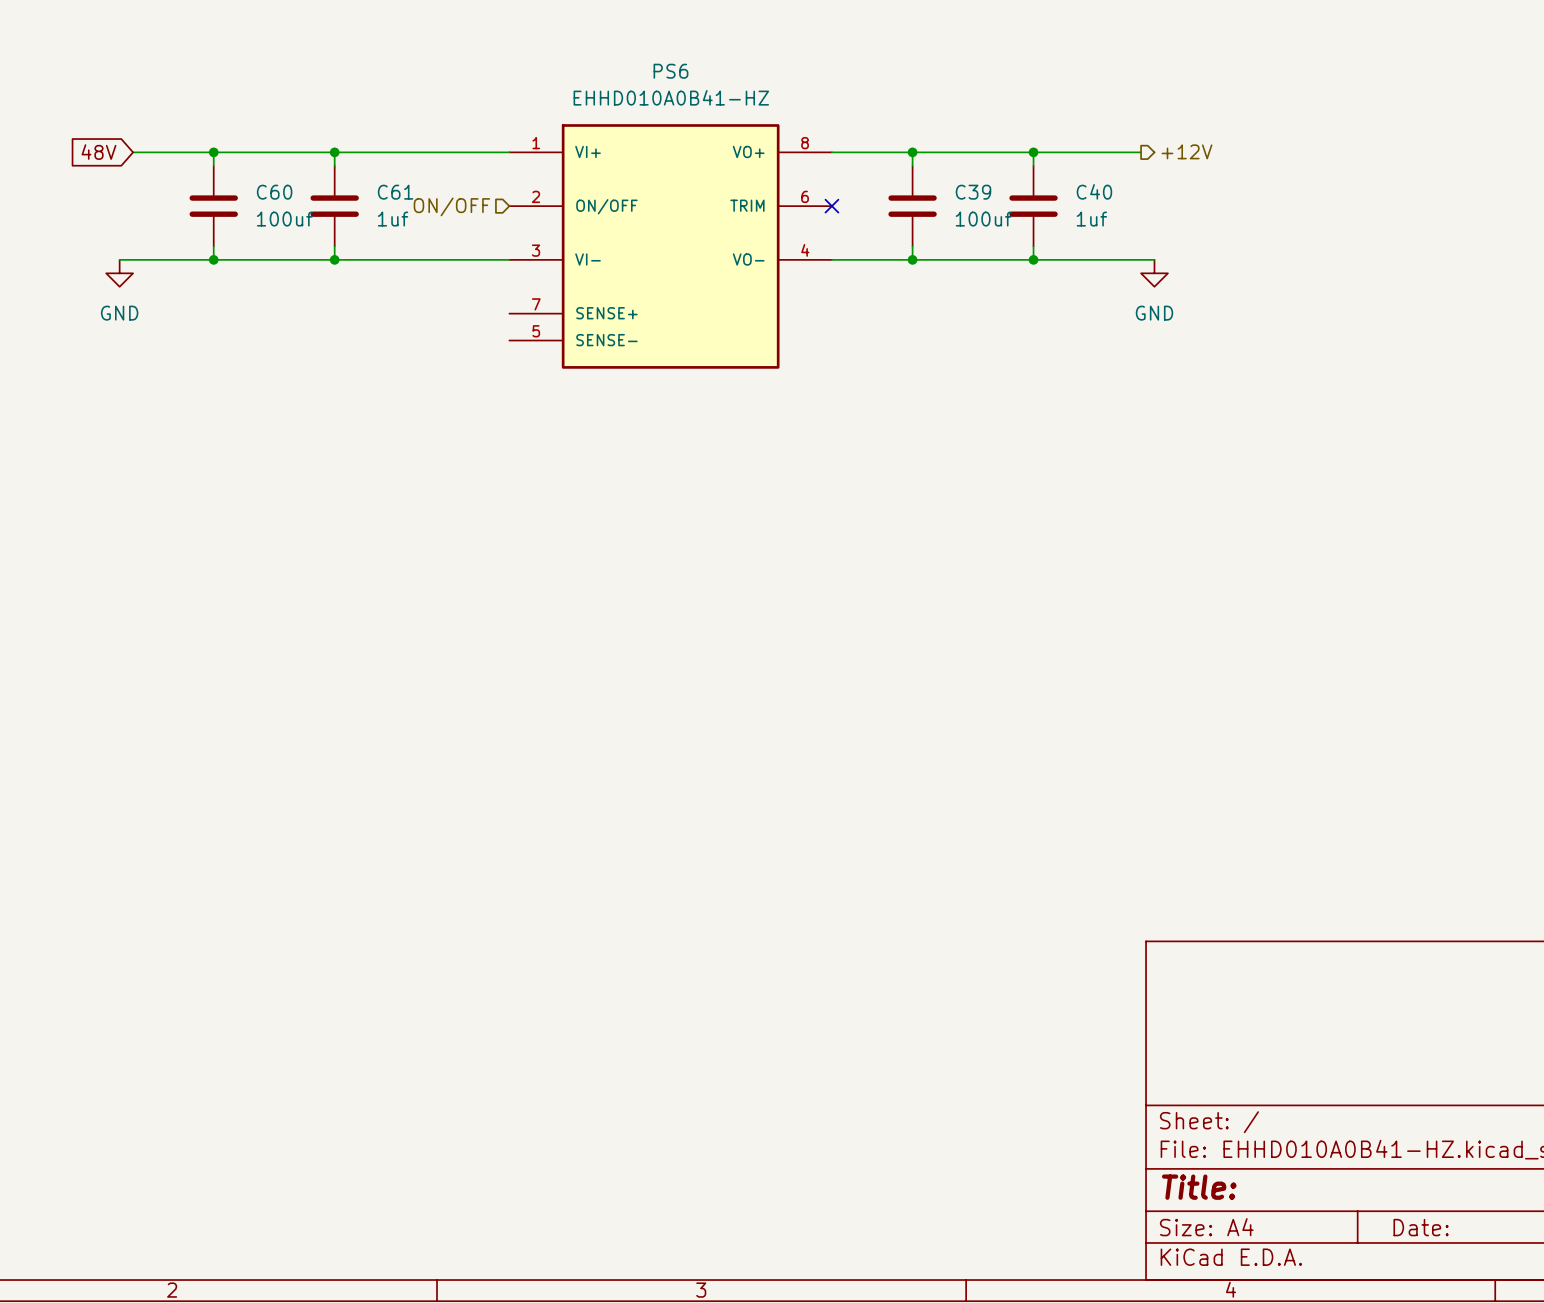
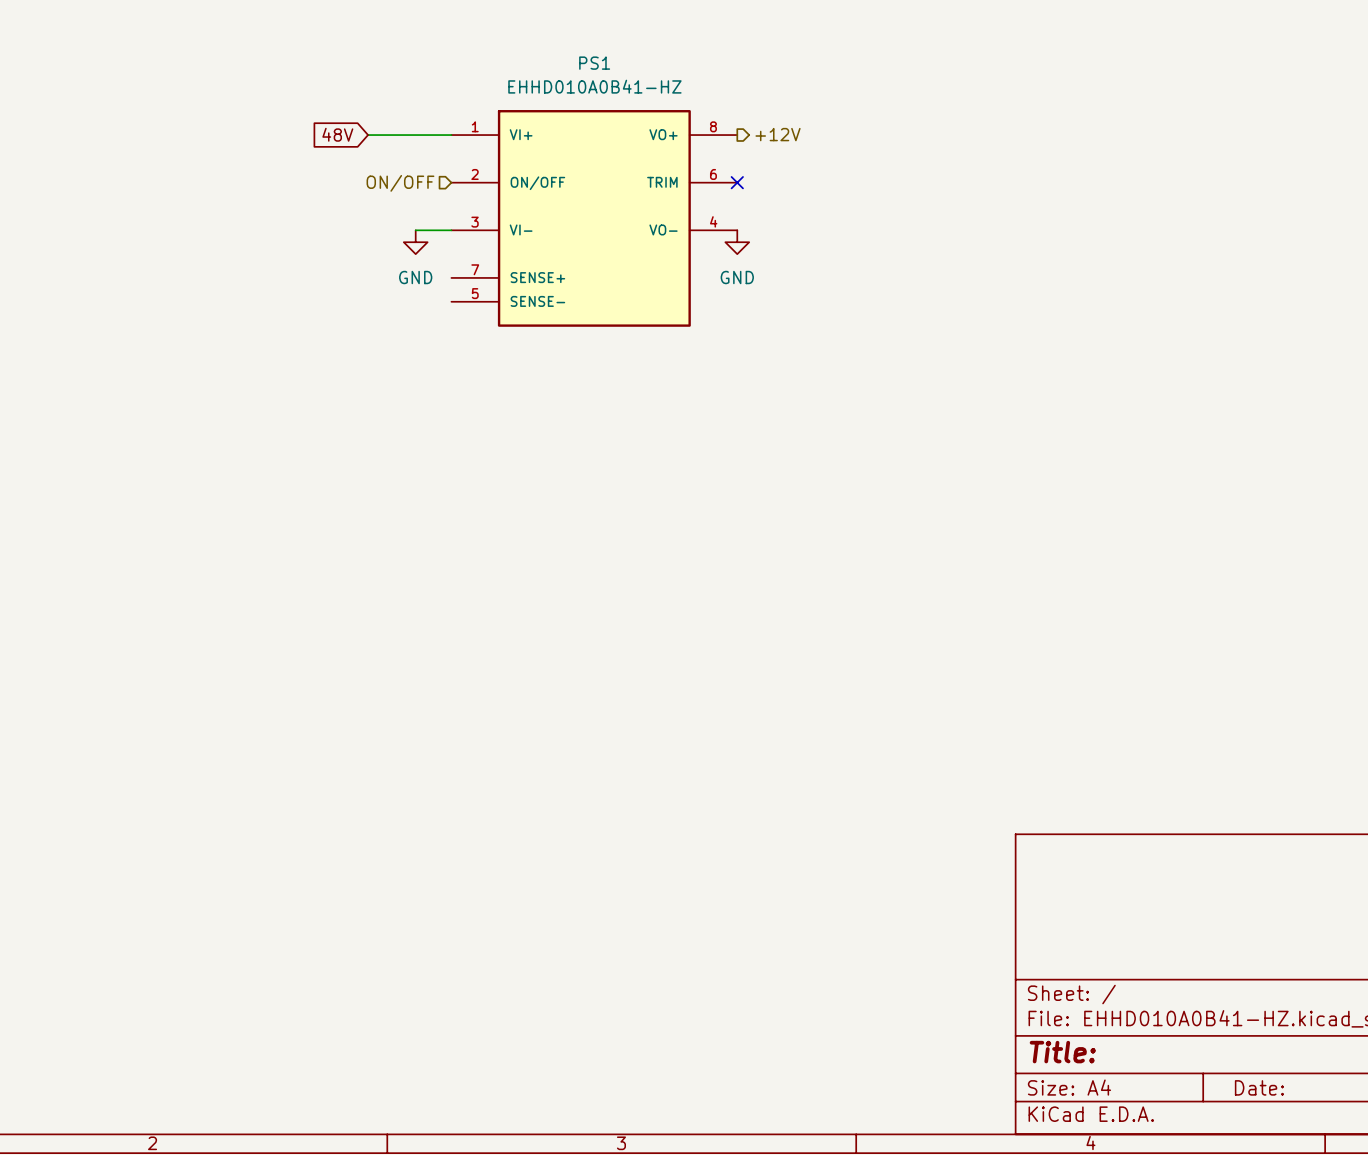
PS6 name: PS6 (670, 71) -> PS1 (594, 63)
hierarchical label: none -> +12V (778, 134)
hierarchical label: +12V (1187, 151) -> none
global label: 48V (98, 152) -> none
wire: (133, 152) (415, 152) -> none
wire: (213, 152) (213, 165) -> none
junction: (213, 152) -> none
wire: (334, 152) (334, 165) -> none
junction: (334, 152) -> none
global label: none -> 48V (337, 134)
wire: (831, 152) (1141, 152) -> none
wire: (912, 152) (912, 165) -> none
junction: (912, 152) -> none
wire: (1033, 152) (1033, 165) -> none
junction: (1033, 152) -> none
C60: 100uf (213, 206) -> none
C61: 1uf (334, 206) -> none
C39: 100uf (912, 206) -> none
C40: 1uf (1033, 206) -> none
wire: (213, 246) (213, 259) -> none
wire: (334, 246) (334, 259) -> none
wire: (912, 246) (912, 259) -> none
wire: (1033, 246) (1033, 259) -> none
wire: (119, 259) (469, 259) -> none
junction: (213, 259) -> none
junction: (334, 259) -> none
wire: (831, 259) (1154, 259) -> none
junction: (912, 259) -> none
junction: (1033, 259) -> none
power symbol: GND (119, 273) -> none
power symbol: none -> GND (415, 242)
power symbol: none -> GND (737, 242)
power symbol: GND (1154, 273) -> none

